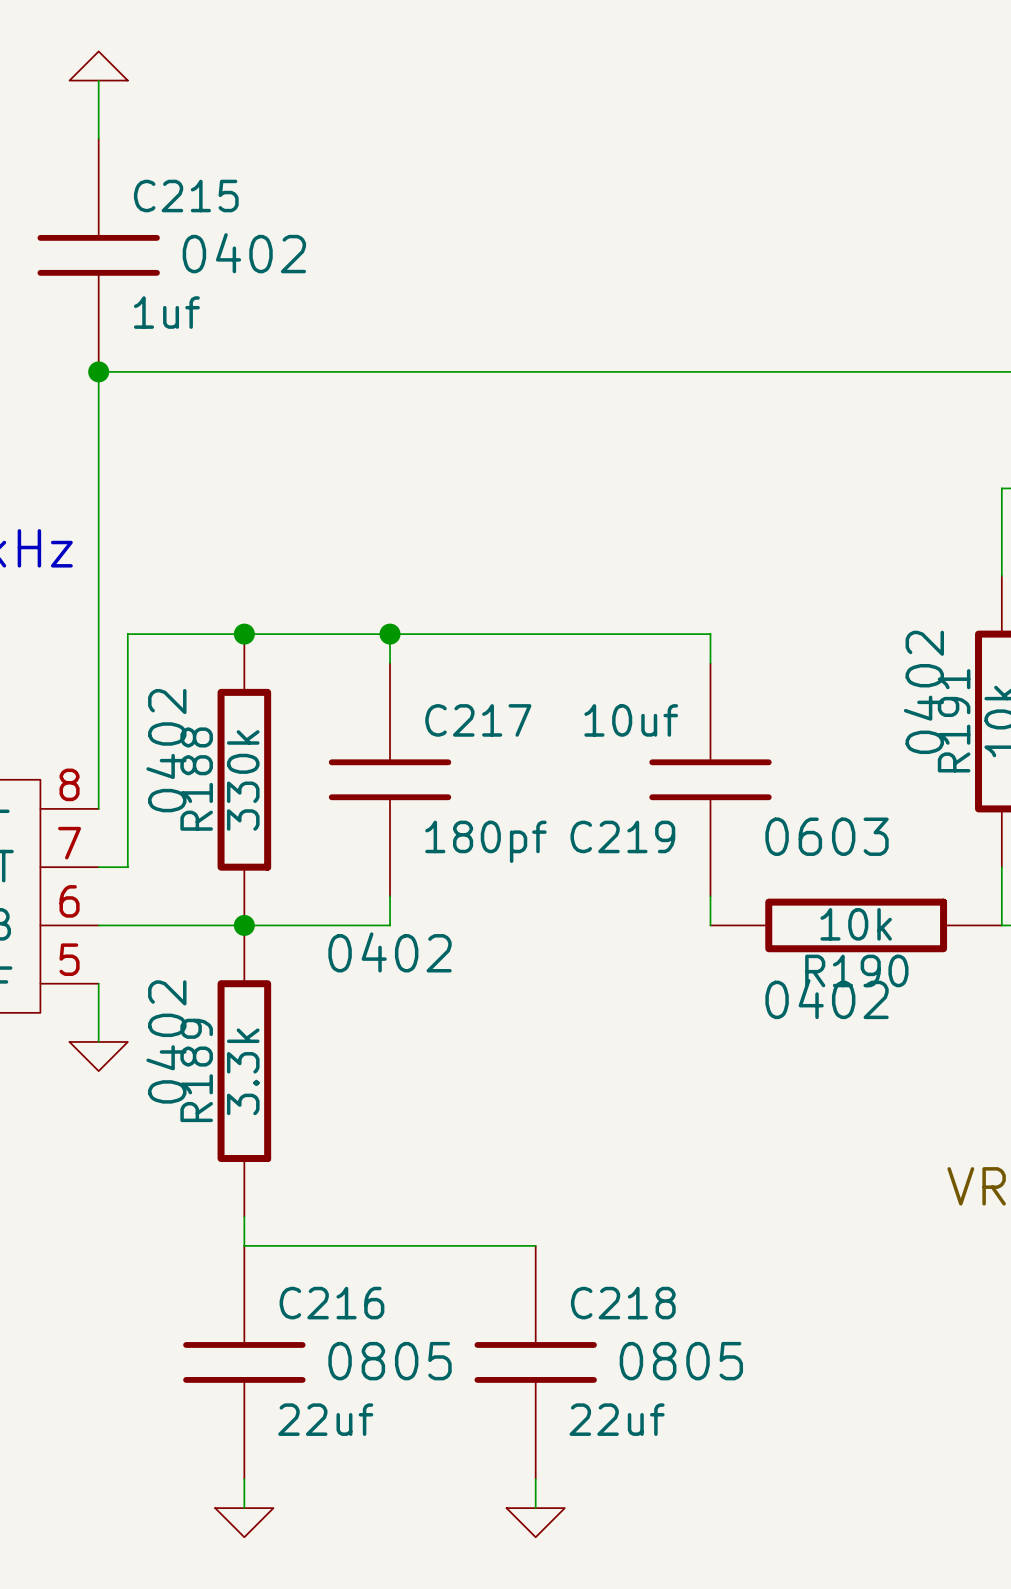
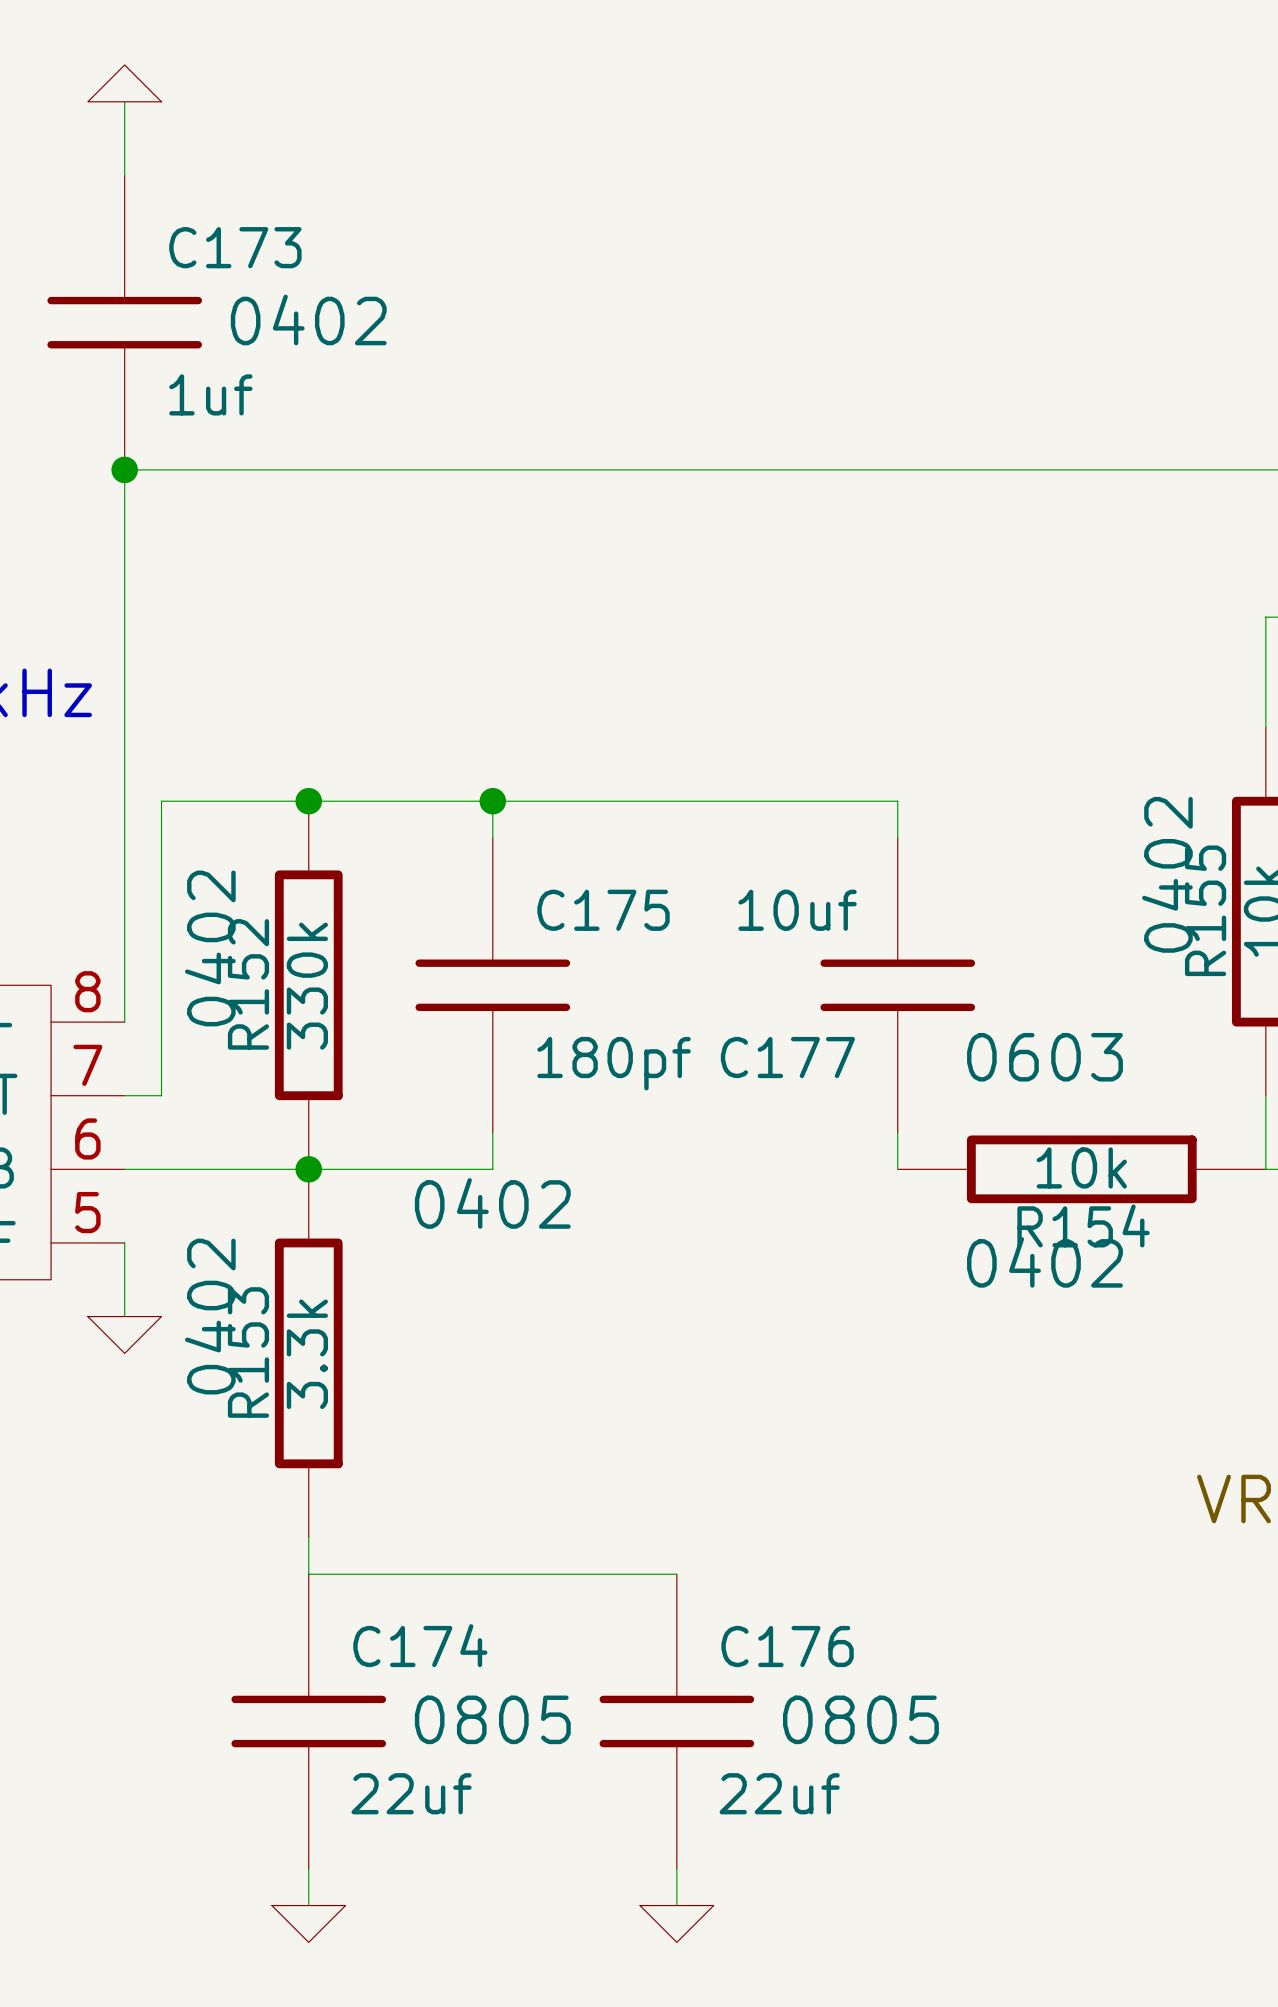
C215 name: C215 (186, 196) -> C173 (235, 247)
C217 name: C217 (478, 720) -> C175 (603, 910)
R191 name: R191 (954, 720) -> R155 (1205, 910)
R188 name: R188 (196, 779) -> R152 (248, 984)
C219 name: C219 (622, 836) -> C177 (787, 1057)
R190 name: R190 (856, 970) -> R154 (1083, 1225)
R189 name: R189 (196, 1070) -> R153 (248, 1352)
C216 name: C216 (331, 1303) -> C174 (420, 1645)
C218 name: C218 (623, 1303) -> C176 (787, 1646)

